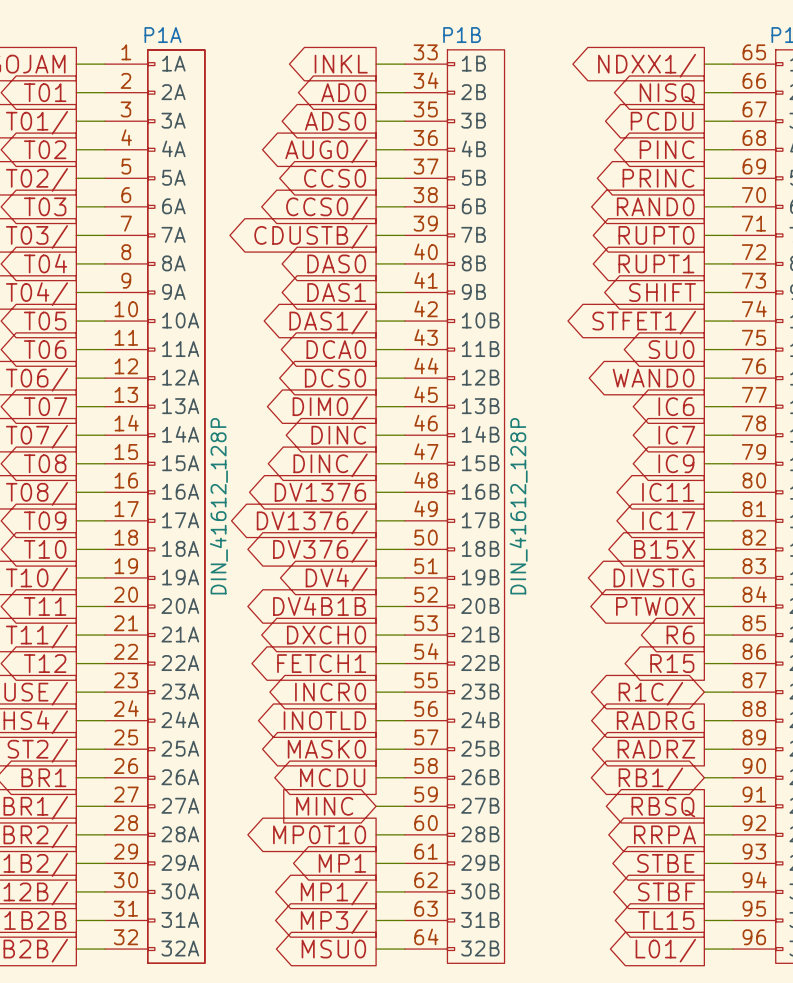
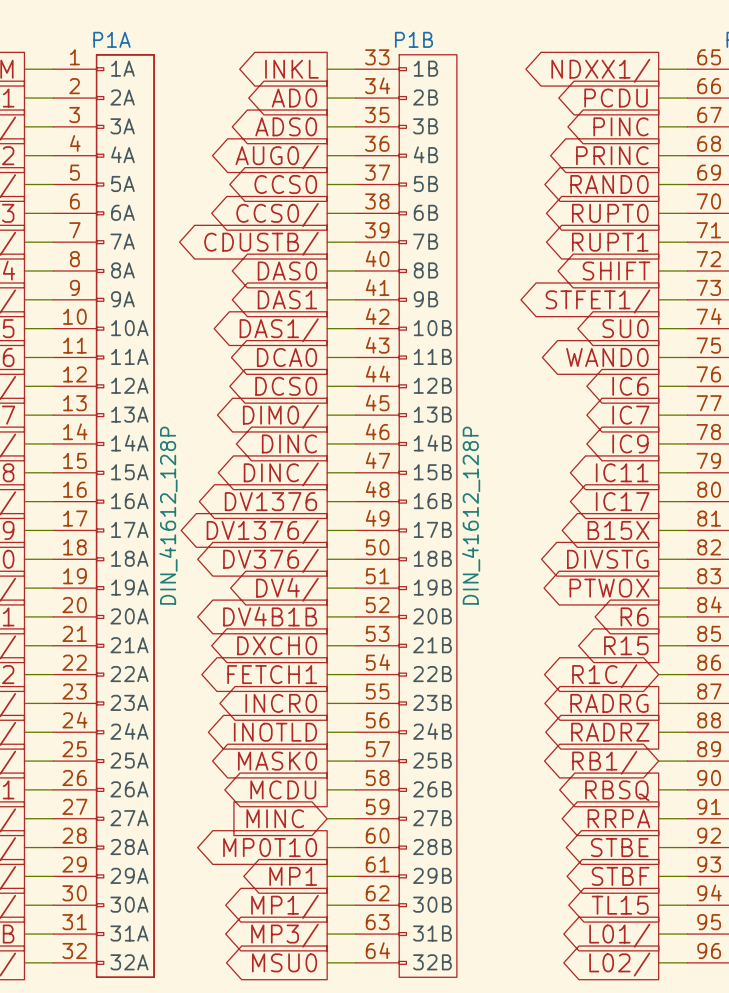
global label: NISQ (667, 93) -> PCDU (616, 98)
global label: PCDU (662, 121) -> PINC (621, 126)
global label: PINC (667, 149) -> PRINC (612, 155)
global label: PRINC (658, 178) -> RAND0 (609, 184)
global label: RAND0 (655, 206) -> RUPT0 (610, 213)
global label: RUPT0 (656, 235) -> RUPT1 (610, 242)
global label: RUPT1 (656, 263) -> SHIFT (616, 270)
global label: SHIFT (662, 292) -> STFET1/ (597, 301)
global label: STFET1/ (644, 322) -> SU0 (625, 328)
global label: SU0 (671, 349) -> WAND0 (607, 357)
global label: WAND0 (653, 378) -> IC6 (630, 386)
global label: IC6 (676, 406) -> IC7 (630, 415)
global label: IC7 (676, 435) -> IC9 (630, 443)
global label: IC9 (676, 463) -> IC11 (622, 472)
global label: IC11 (668, 492) -> IC17 (622, 501)
global label: IC17 (668, 520) -> B15X (618, 530)
global label: B15X (664, 549) -> DIVSTG (607, 559)
global label: DIVSTG (653, 577) -> PTWOX (609, 588)
global label: PTWOX (655, 606) -> R6 (634, 616)
global label: R6 (680, 635) -> R15 (626, 645)
global label shape: output (672, 663) -> bidirectional (604, 676)
global label: R15 (672, 663) -> R1C/ (604, 676)
global label shape: bidirectional (650, 693) -> output (609, 703)
global label: R1C/ (650, 693) -> RADRG (609, 703)
global label: RADRG (655, 720) -> RADRZ (610, 732)
global label shape: output (656, 749) -> bidirectional (604, 762)
global label: RADRZ (656, 749) -> RB1/ (604, 762)
global label shape: bidirectional (650, 779) -> output (617, 790)
global label: RB1/ (650, 779) -> RBSQ (617, 790)
global label: RBSQ (663, 807) -> RRPA (618, 818)
global label: RRPA (664, 834) -> STBE (619, 847)
global label: STBE (665, 863) -> STBF (620, 876)
global label: STBF (666, 891) -> TL15 (620, 905)
global label: TL15 (666, 920) -> L01/ (619, 935)
global label: L01/ (665, 950) -> L02/ (619, 964)

